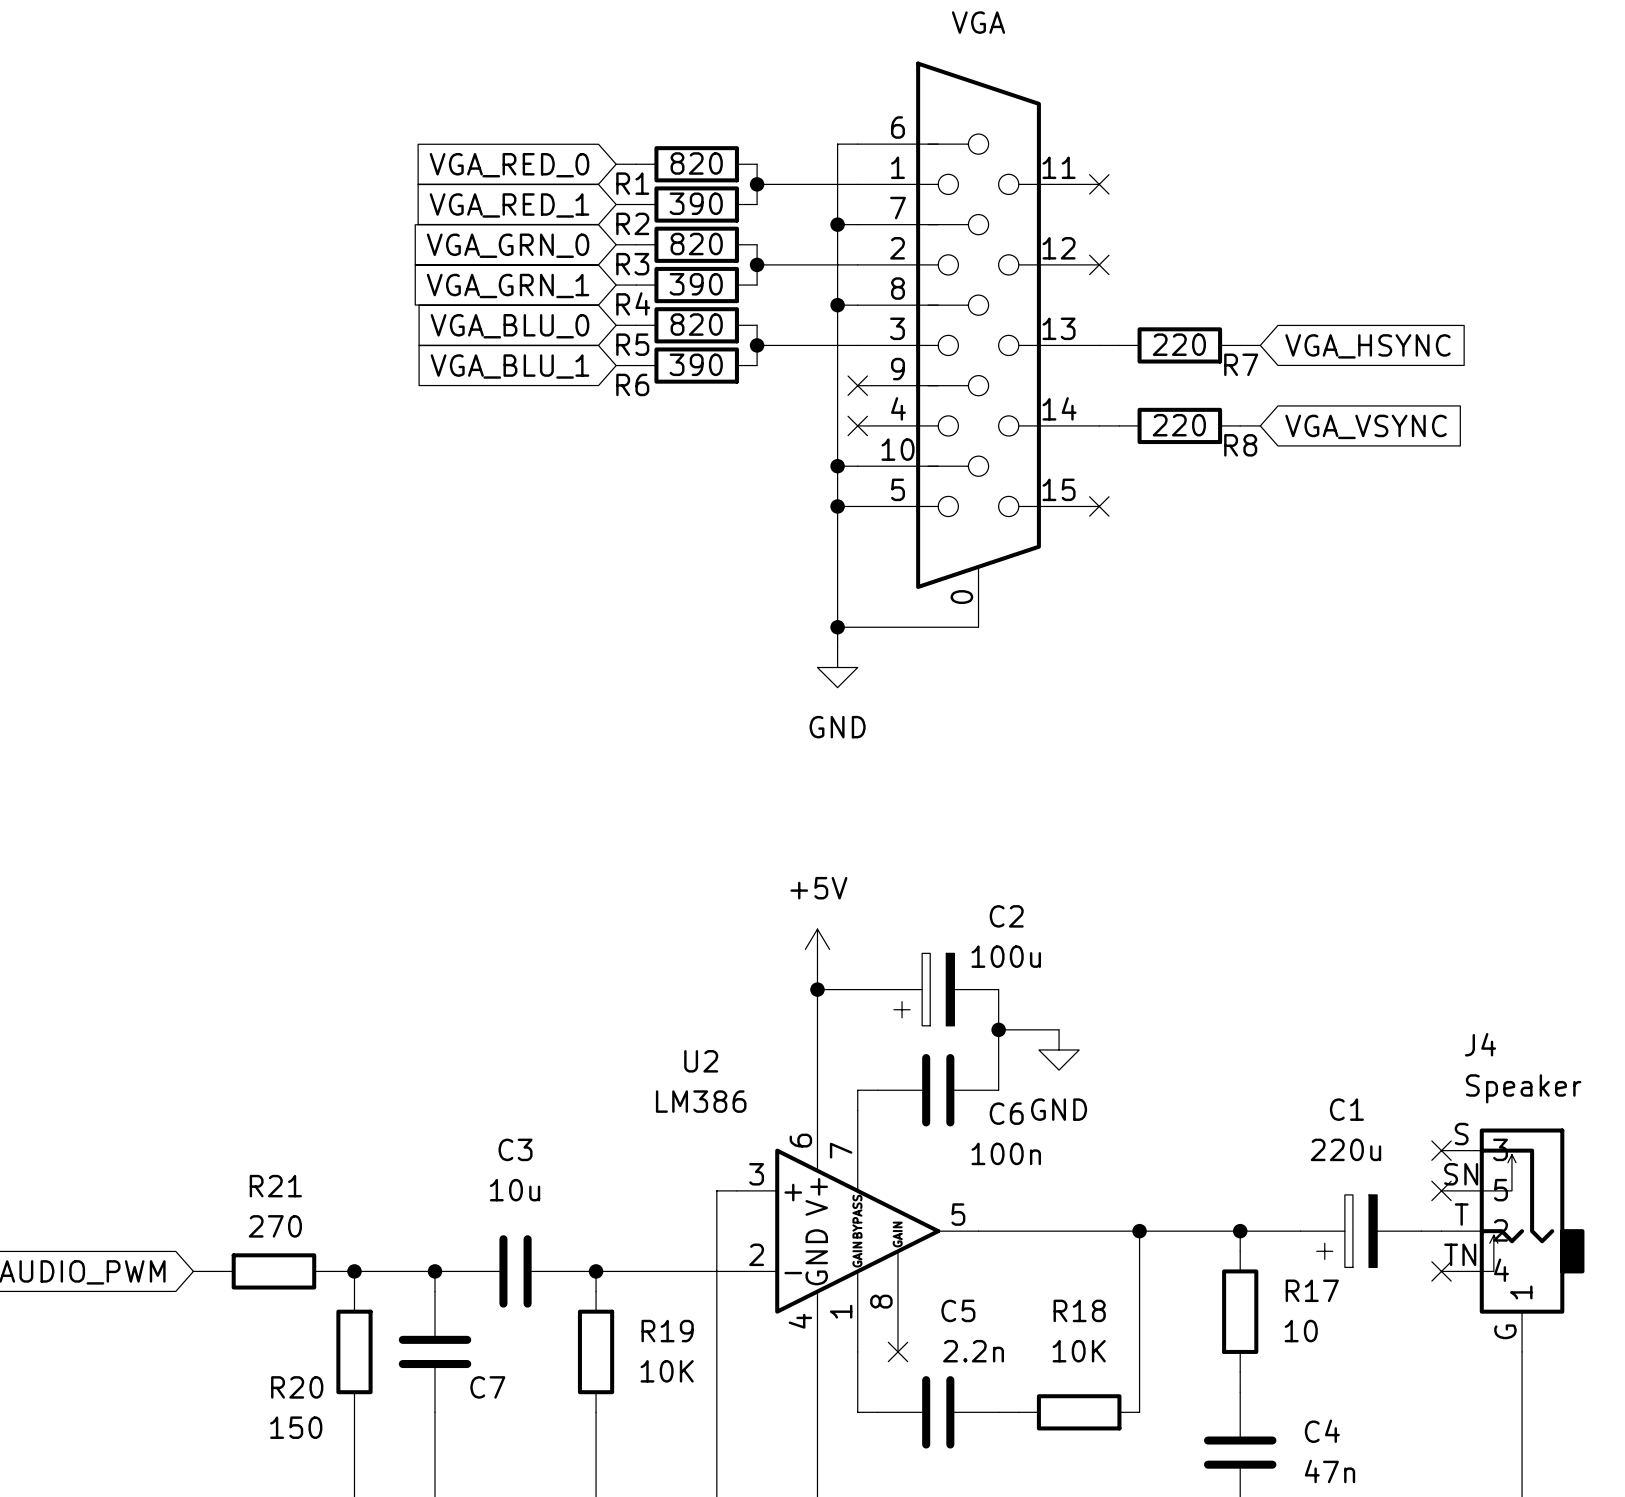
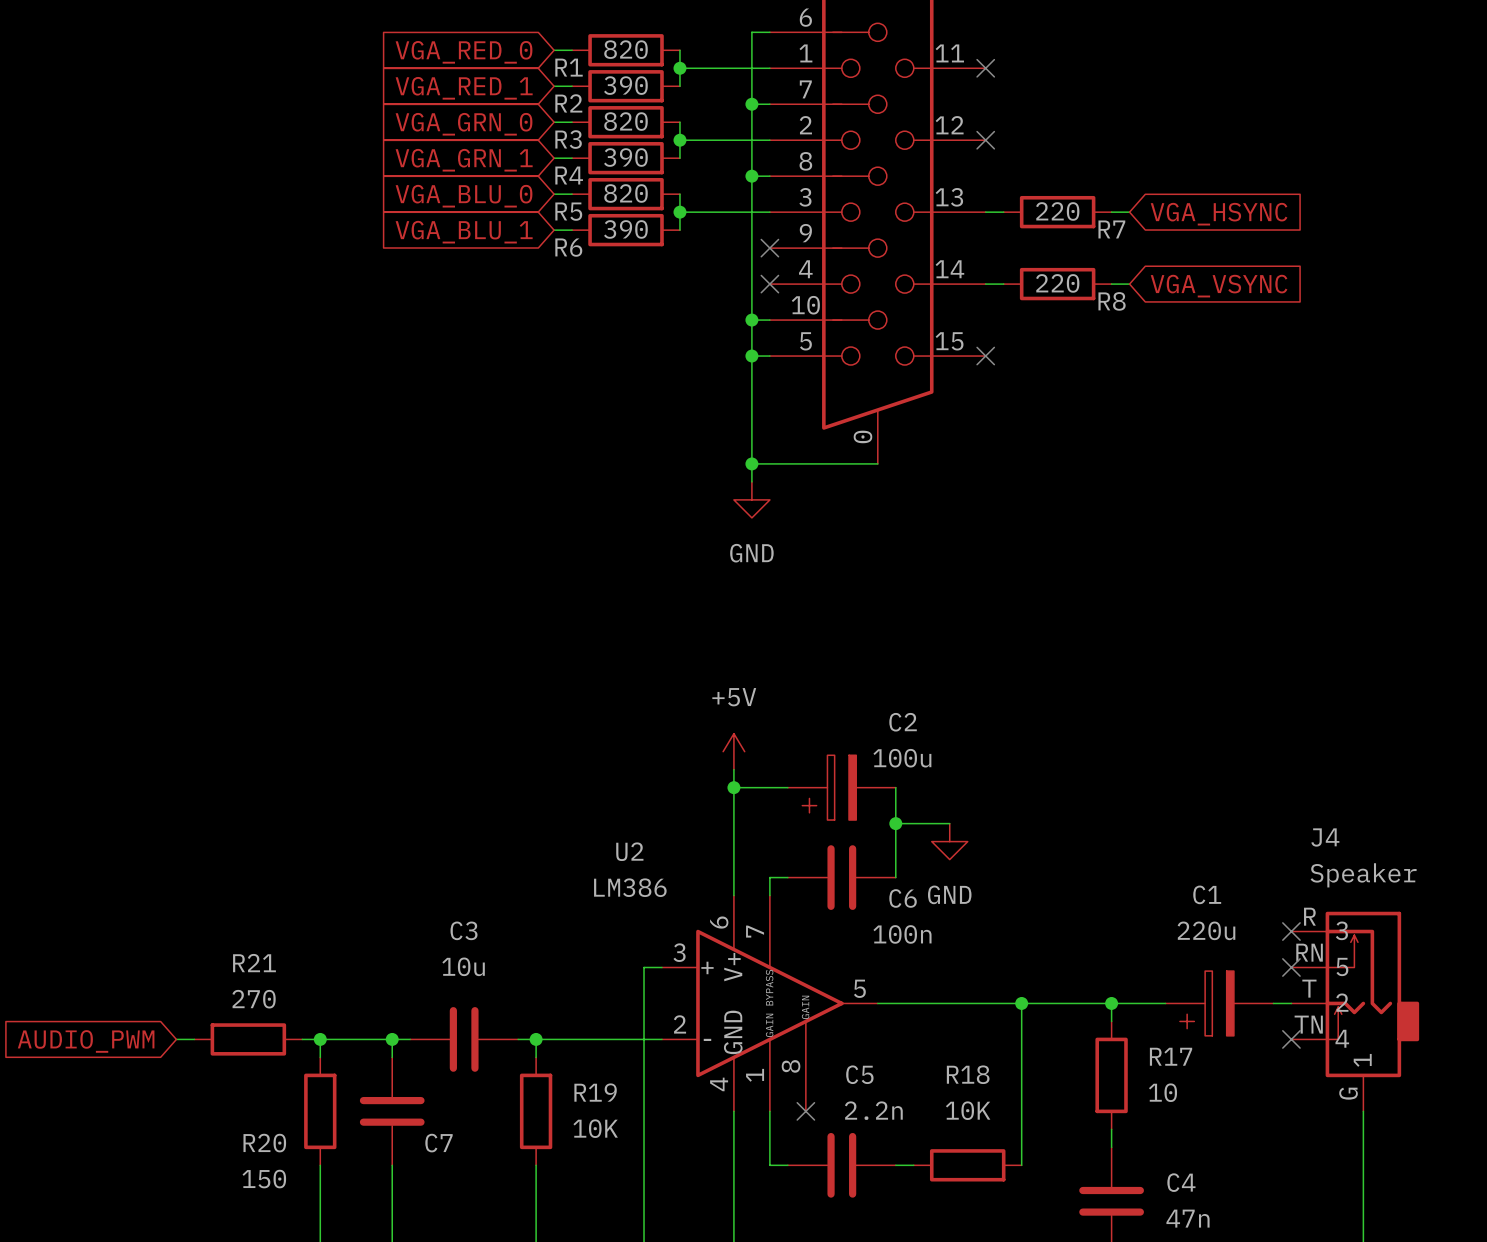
J4 pin number: S (1461, 1134) -> R (1309, 916)
J4 pin number: SN (1461, 1174) -> RN (1309, 952)

